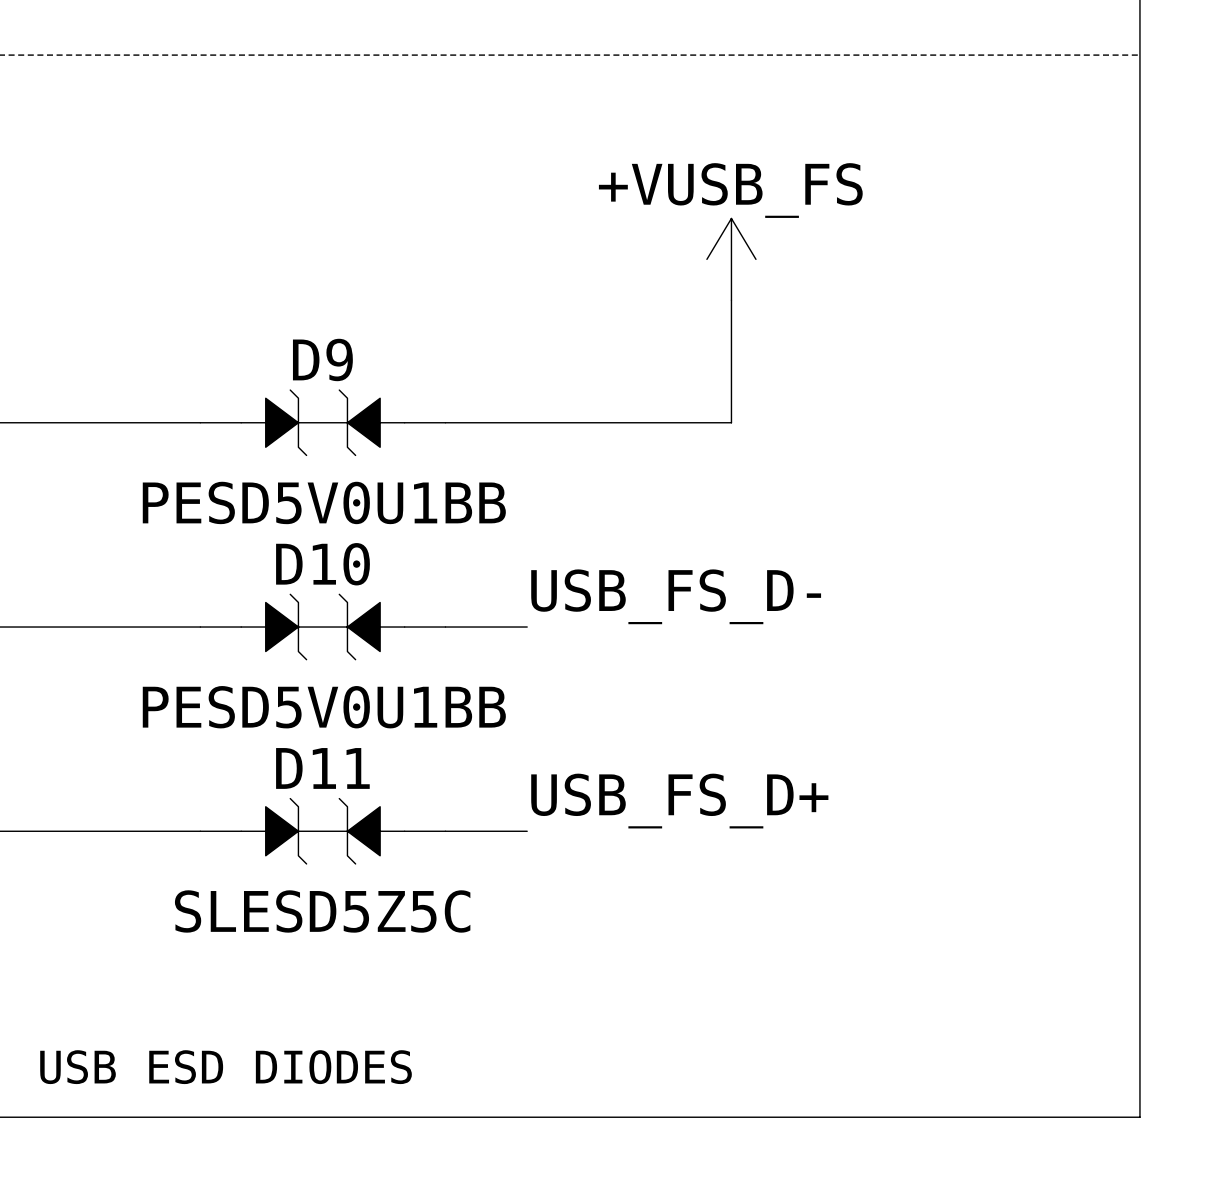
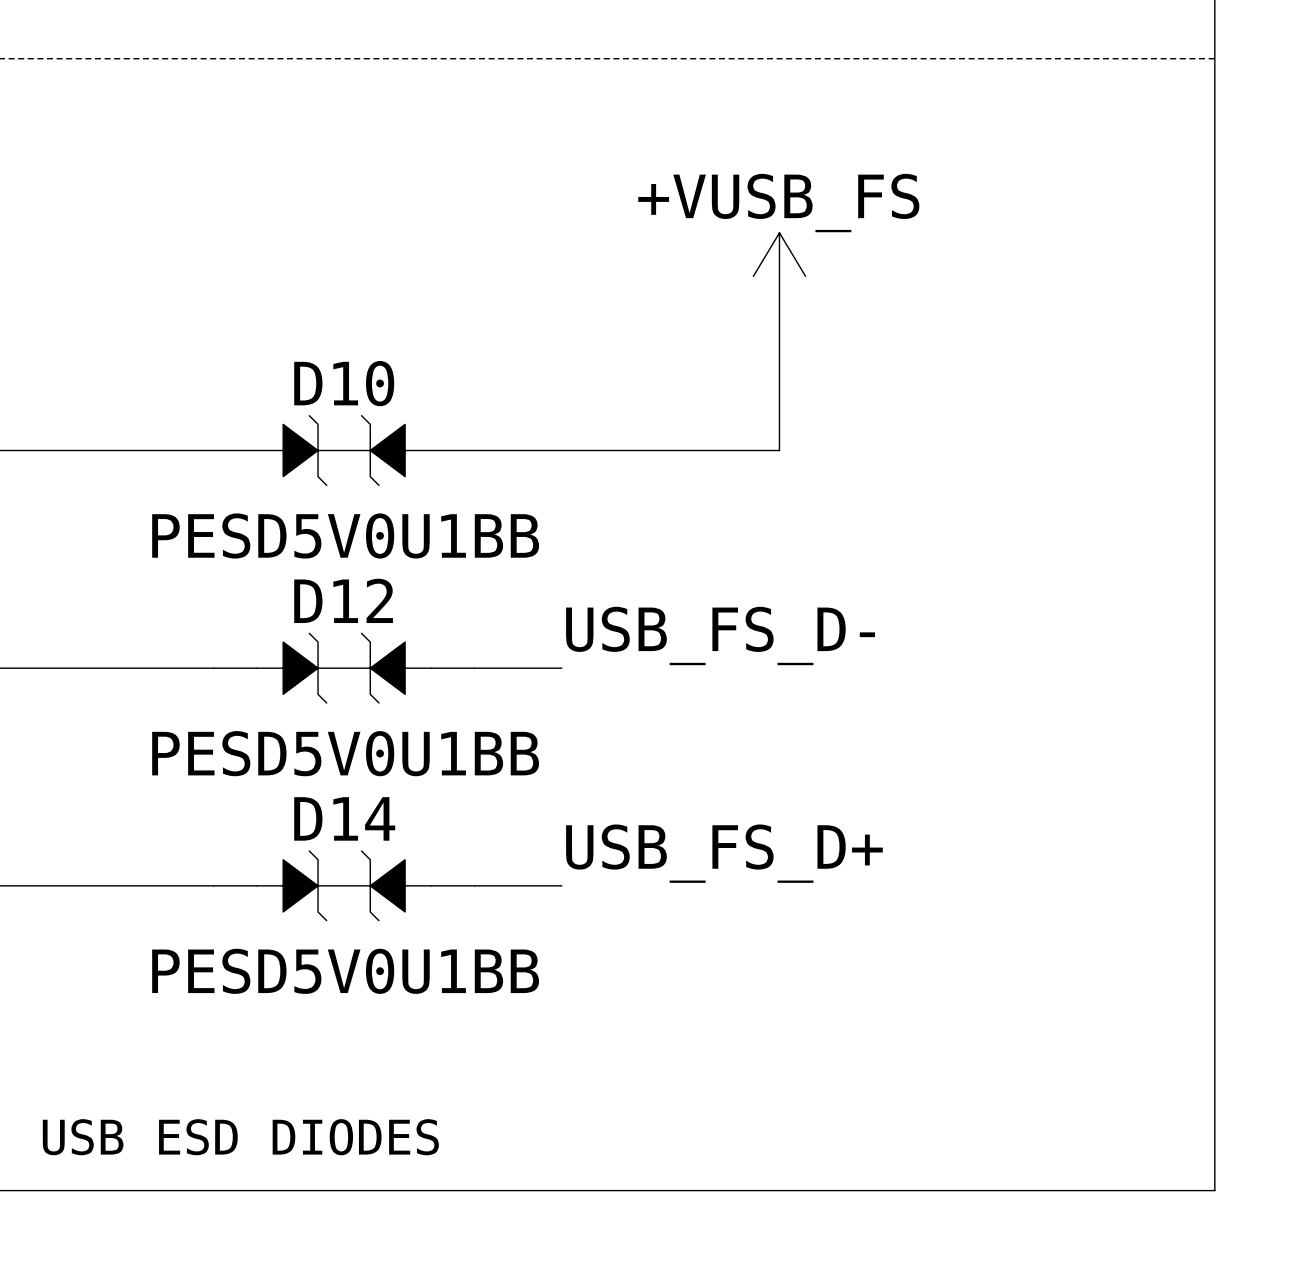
D9 name: D9 (322, 359) -> D10 (344, 383)
D10 name: D10 (322, 564) -> D12 (343, 600)
D11 name: D11 (322, 768) -> D14 (344, 818)
D11 value: SLESD5Z5C (322, 911) -> PESD5V0U1BB (345, 971)

